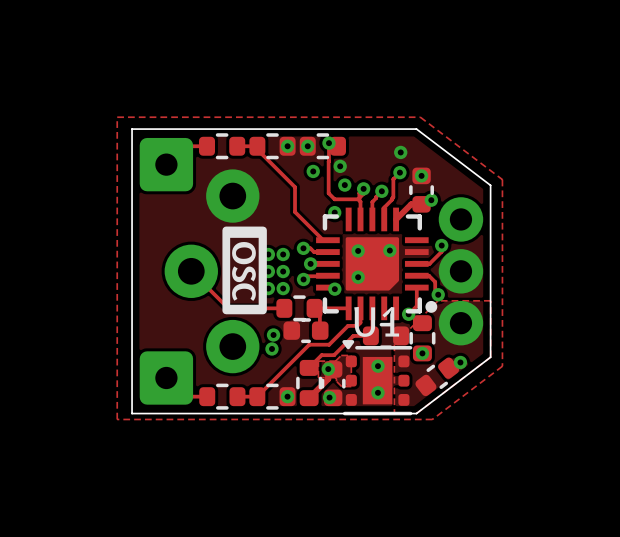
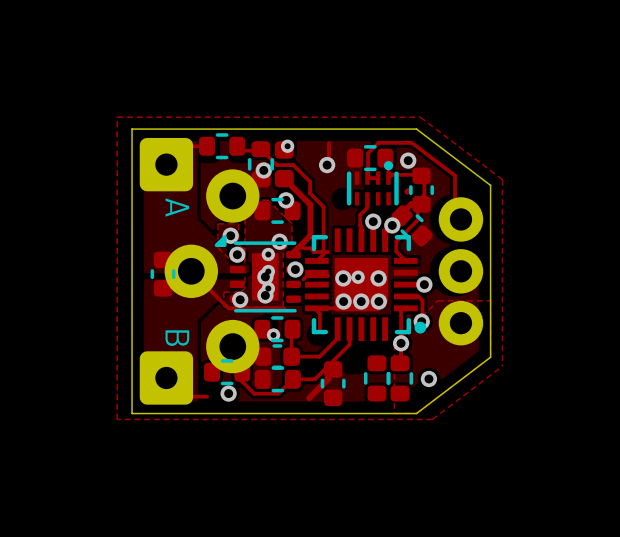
via: (328, 143) -> none
track: (233, 146) (254, 146) (295, 187) (295, 212) (323, 240) (327, 240) -> none
part rotation: 0° (272, 146) -> 90° clockwise (260, 164)
via: (307, 146) -> none
part: (322, 146) -> none
track: none -> (239, 150) (260, 149) (276, 165) (293, 165) (310, 181) (310, 193) (323, 206) (323, 254) (316, 260)
via: (400, 152) -> none
part: none -> (370, 158)
track: none -> (385, 158) (388, 161) (388, 178) (391, 174) (416, 174) (424, 182) (424, 194) (416, 203) (417, 220) (396, 241) (396, 251) (405, 260)
via: none -> (408, 160)
track: (328, 161) (328, 193) (334, 199) (358, 199) (363, 193) (363, 188) (359, 193) (359, 200) (360, 201) (360, 219) -> none
part: none -> (284, 164)
via: none -> (327, 165)
via: (340, 166) -> none
via: none -> (263, 170)
via: (313, 171) -> none
track: (399, 172) (393, 179) (393, 197) (384, 207) (384, 219) -> none
via: (399, 172) -> none
via: (421, 175) -> none
track: none -> (284, 178) (310, 204) (310, 235) (293, 254)
track: none -> (378, 178) (367, 178) (368, 153) (378, 142) (411, 142) (455, 175) (455, 219)
part: none -> (372, 183)
via: (344, 185) -> none
via: (363, 188) -> none
track: none -> (408, 190) (407, 191)
track: (381, 191) (372, 201) (372, 219) -> none
via: (381, 191) -> none
track: none -> (367, 198) (367, 207) (360, 215) (361, 240)
zone outline: none -> (253, 200) (268, 200) (292, 223) (292, 241) (283, 250) (283, 306) (223, 306) (223, 292) (241, 292) (244, 288) (244, 208) (253, 200)
via: none -> (286, 200)
via: (431, 200) -> none
text: none -> A (177, 207)
part: none -> (277, 210)
via: (334, 212) -> none
via: none -> (373, 221)
zone outline: none -> (217, 223) (238, 223) (238, 244) (244, 248) (244, 259) (229, 259) (217, 247) (217, 223)
via: none -> (392, 225)
part: none -> (412, 225)
drawing: [222, 226, 267, 315] -> none
via: none -> (230, 235)
track: (441, 245) (441, 251) (429, 263) (416, 263) -> none
via: (441, 245) -> none
via: (303, 248) -> none
via: (358, 250) -> none
via: (389, 250) -> none
via: none -> (237, 254)
via position: (283, 254) -> (279, 241)
via: (310, 263) -> none
part position: (376, 263) -> (365, 284)
via: none -> (295, 269)
text: OSC (243, 271) -> none
via: (283, 271) -> none
part: none -> (257, 273)
part: none -> (163, 274)
track: (416, 275) (428, 275) (435, 281) (435, 291) (438, 294) -> none
via: none -> (265, 276)
via: none -> (343, 278)
via: none -> (378, 278)
via: (303, 279) -> none
track: (416, 287) (416, 306) (408, 314) -> none
via: (283, 288) -> none
via: (334, 289) -> none
via position: (438, 294) -> (424, 284)
via: none -> (265, 295)
track: none -> (405, 296) (418, 296) (422, 300) (421, 321)
via: none -> (240, 299)
via: none -> (343, 301)
via: none -> (361, 301)
via: none -> (378, 301)
part position: (299, 308) -> (277, 329)
track: (360, 308) (360, 322) (357, 325) (348, 325) (329, 344) (309, 344) (257, 396) (231, 396) -> none
track: (372, 308) (370, 335) (353, 335) (334, 355) (321, 355) (309, 367) -> none
track: none -> (405, 308) (401, 310) (401, 356)
via position: (408, 314) -> (421, 321)
track: none -> (292, 329) (291, 356) (319, 356) (337, 338) (337, 329)
track: none -> (349, 329) (349, 344) (314, 379) (292, 379) (278, 393) (254, 393) (242, 381) (242, 372)
part position: (306, 330) -> (277, 356)
part: (385, 335) -> none
text: none -> B (177, 338)
part: (422, 338) -> none
via: none -> (401, 343)
via: (271, 348) -> none
via: (422, 353) -> none
zone outline: (341, 355) (335, 361) (318, 361) (318, 377) (335, 377) (341, 386) (351, 386) (351, 355) (341, 355) -> none
via: (460, 362) -> none
via: (377, 366) -> none
via: (328, 369) -> none
part: (437, 376) -> none
U1: (377, 377) -> none
part: none -> (376, 378)
part: none -> (400, 378)
via: none -> (428, 378)
part: none -> (277, 379)
part: (309, 383) -> none
via: (377, 392) -> none
via: none -> (228, 393)
part position: (222, 396) -> (227, 372)
part: (272, 396) -> none
via: (287, 396) -> none
via: (329, 397) -> none

